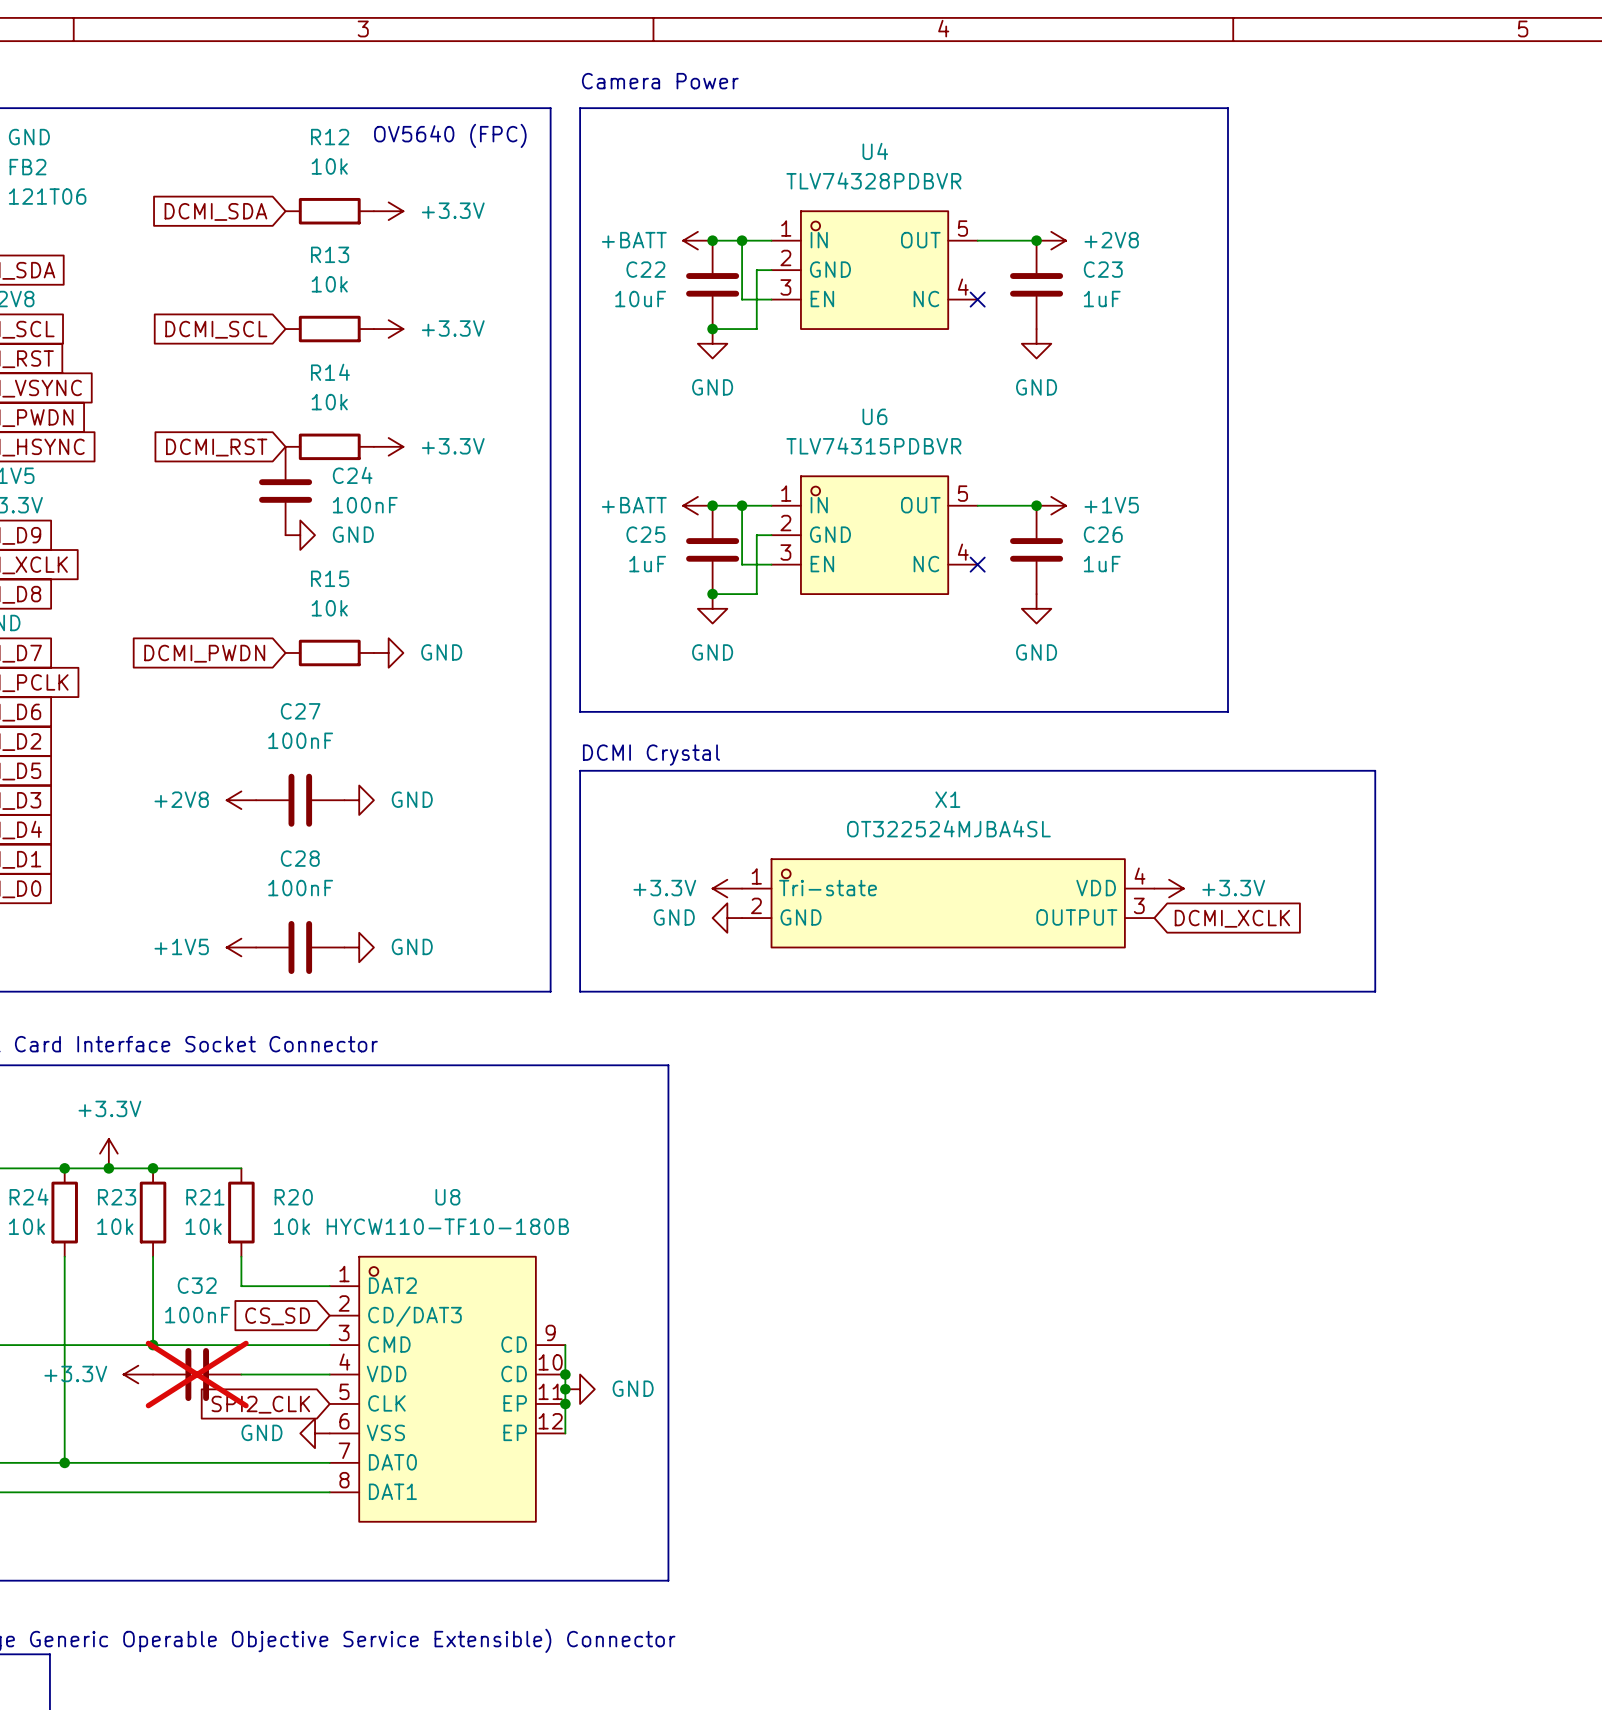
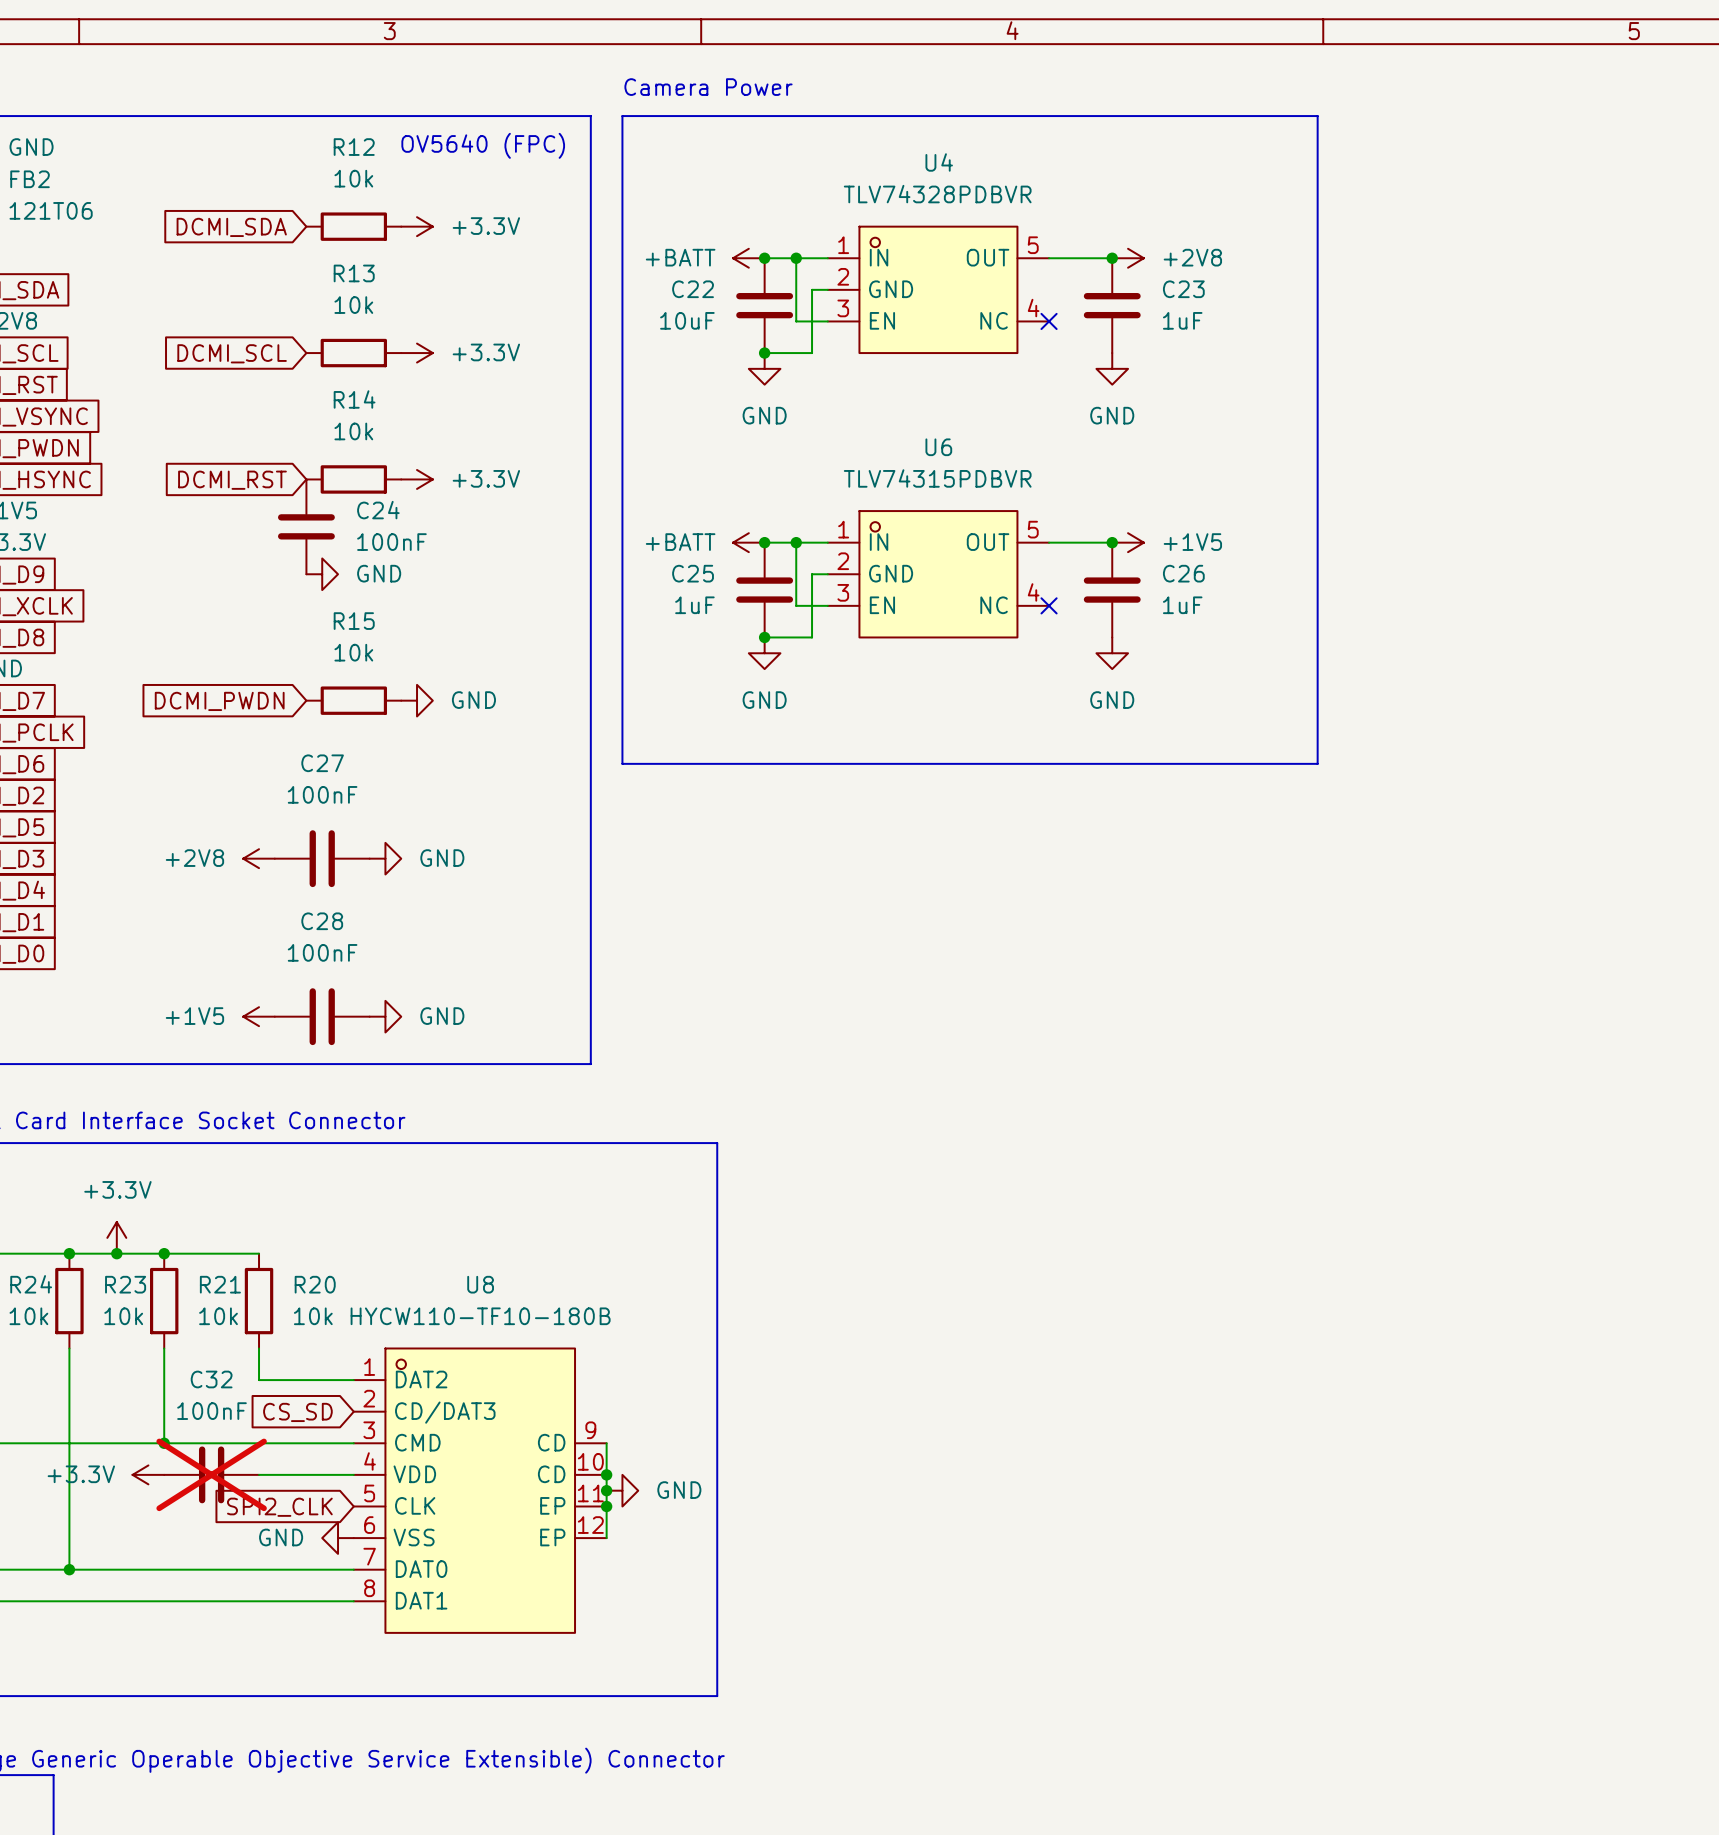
text: DCMI Crystal (651, 755) -> none
line: (580, 770) (1375, 770) (1375, 991) (580, 991) (580, 770) -> none
power symbol: +3.3V (727, 888) -> none
power symbol: +3.3V (1169, 888) -> none
X1: OT322524MJBA4SL (948, 903) -> none
power symbol: GND (727, 918) -> none
global label: DCMI_XCLK (1232, 918) -> none

